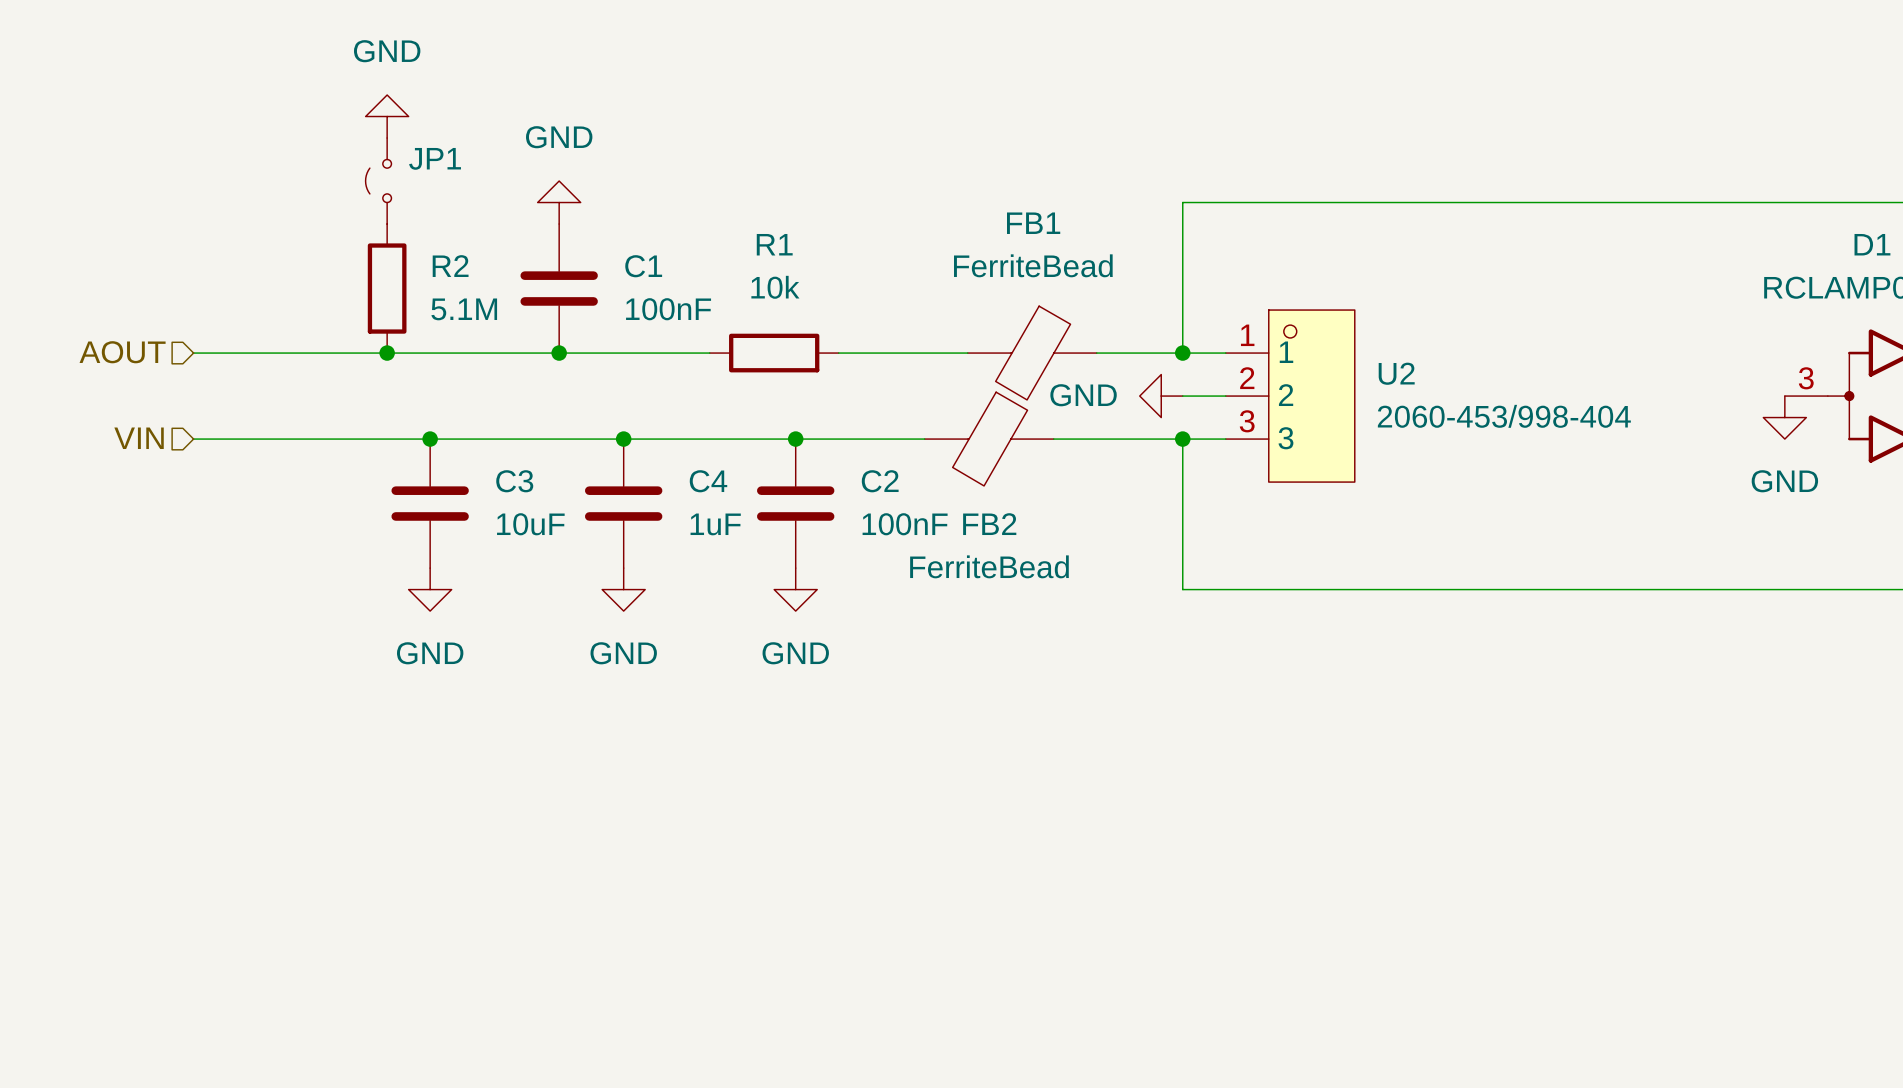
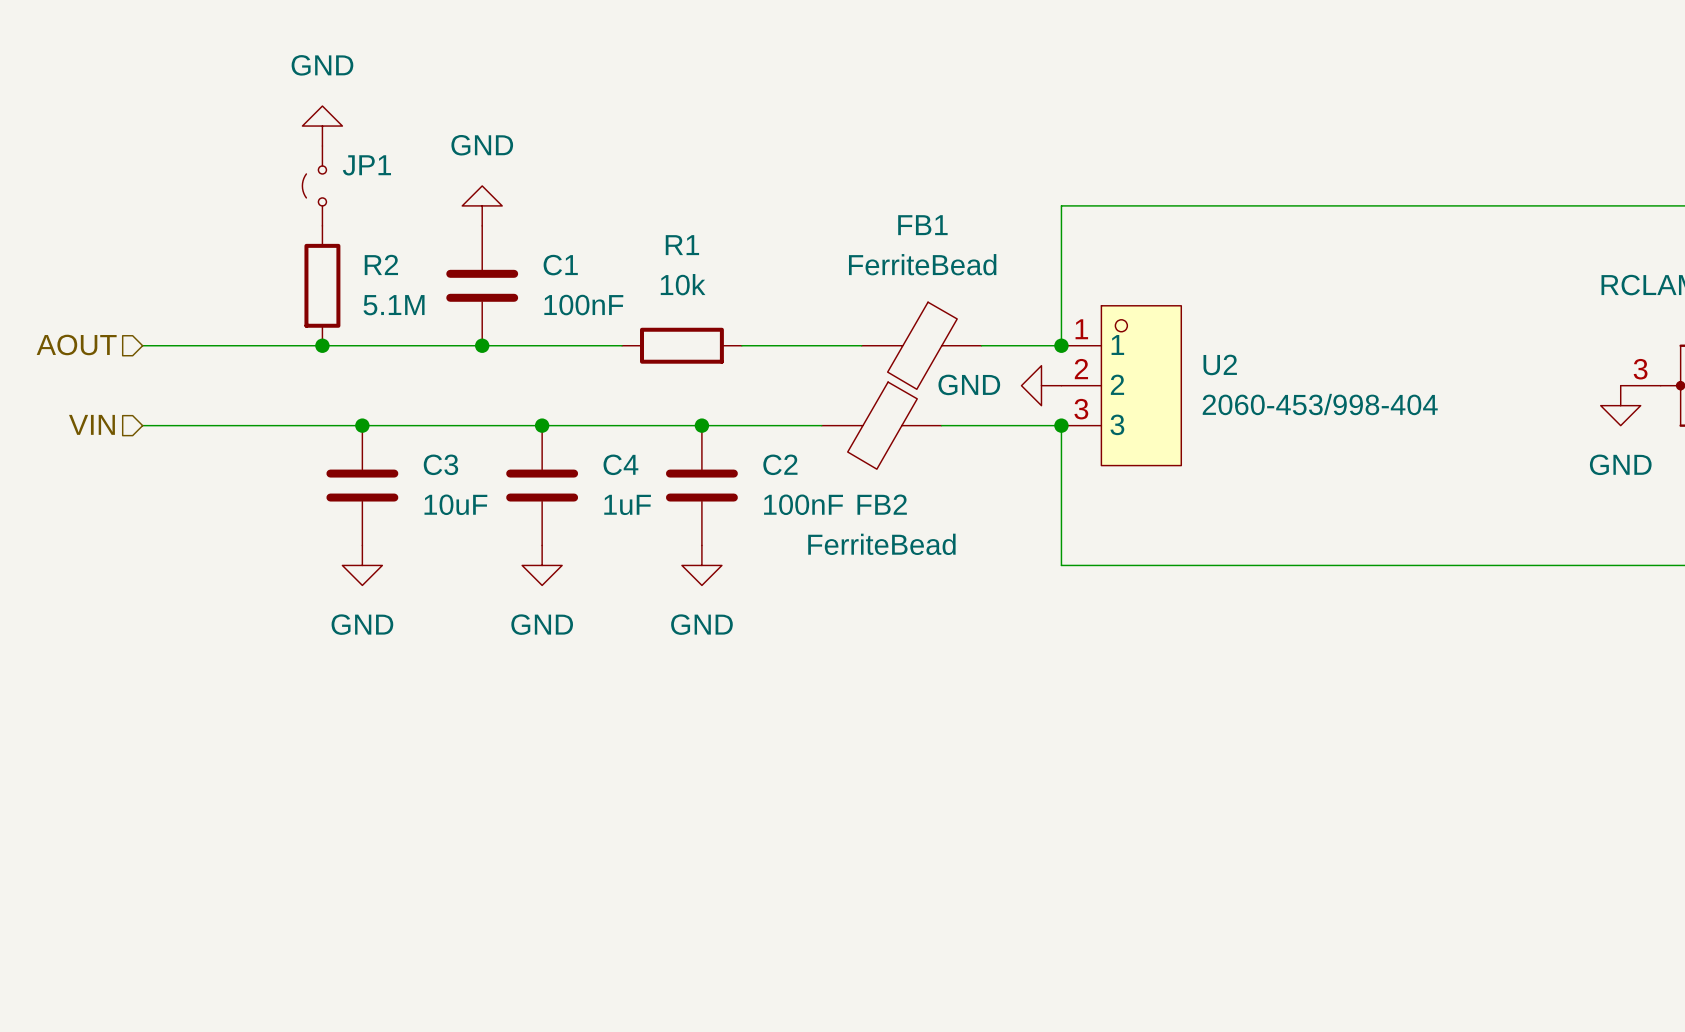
U2 position: (1290, 396) -> (1121, 385)

